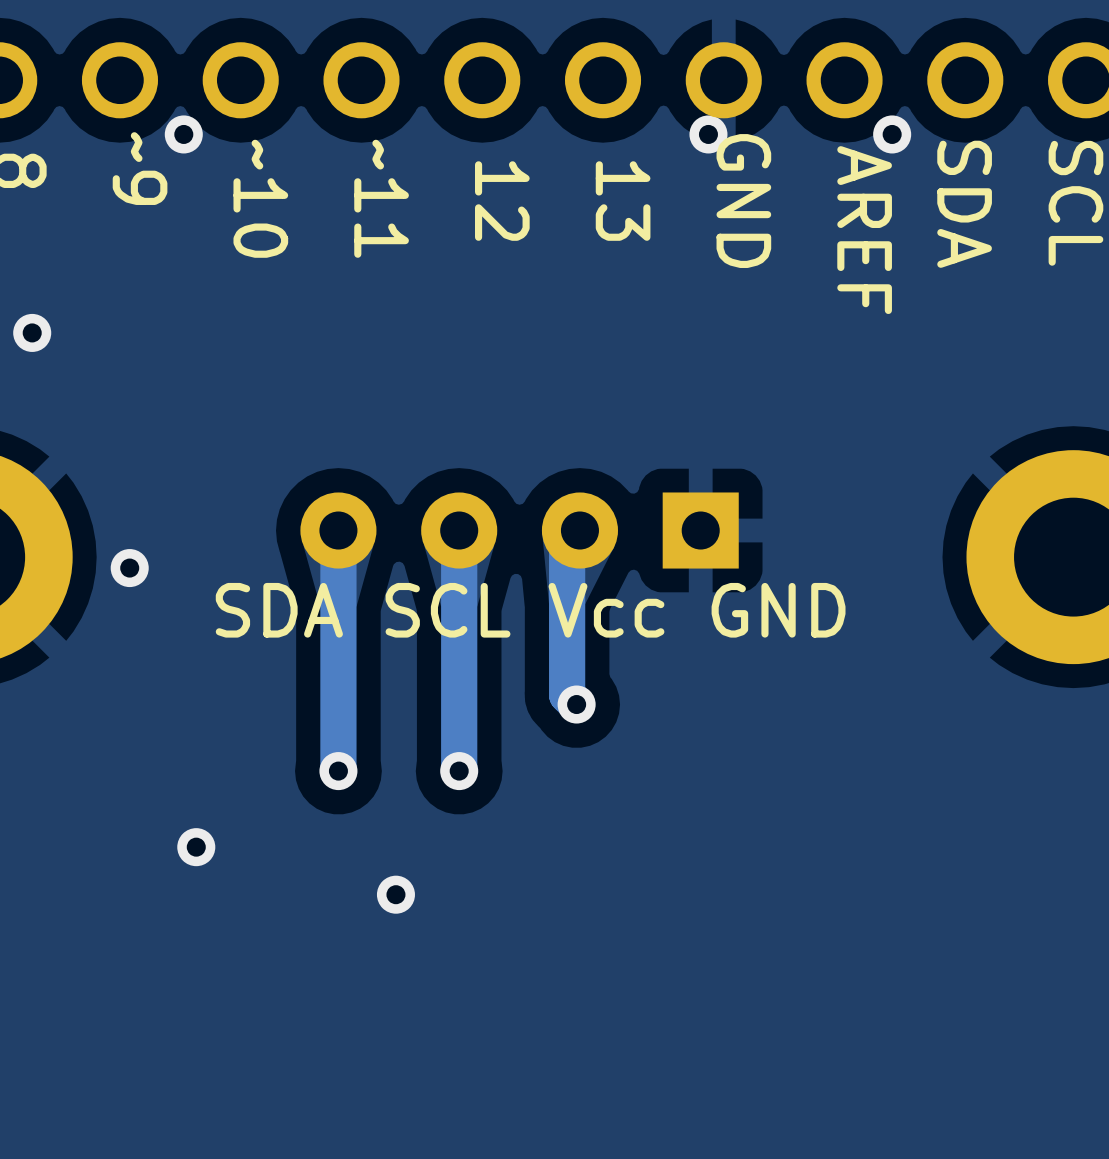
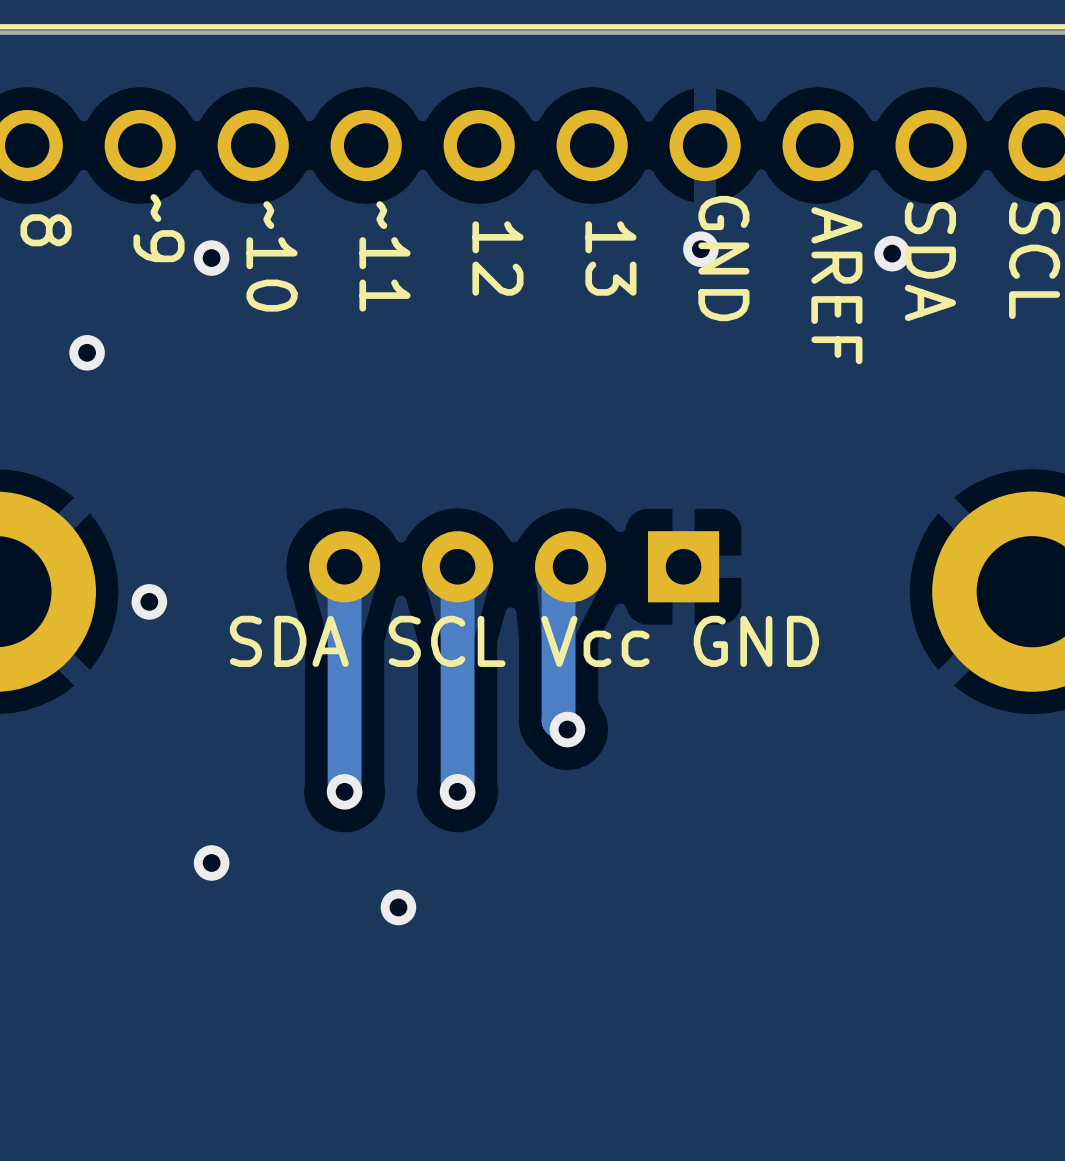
via position: (183, 134) -> (211, 258)
via position: (708, 134) -> (700, 249)
via position: (892, 134) -> (892, 253)
via position: (32, 332) -> (87, 352)

